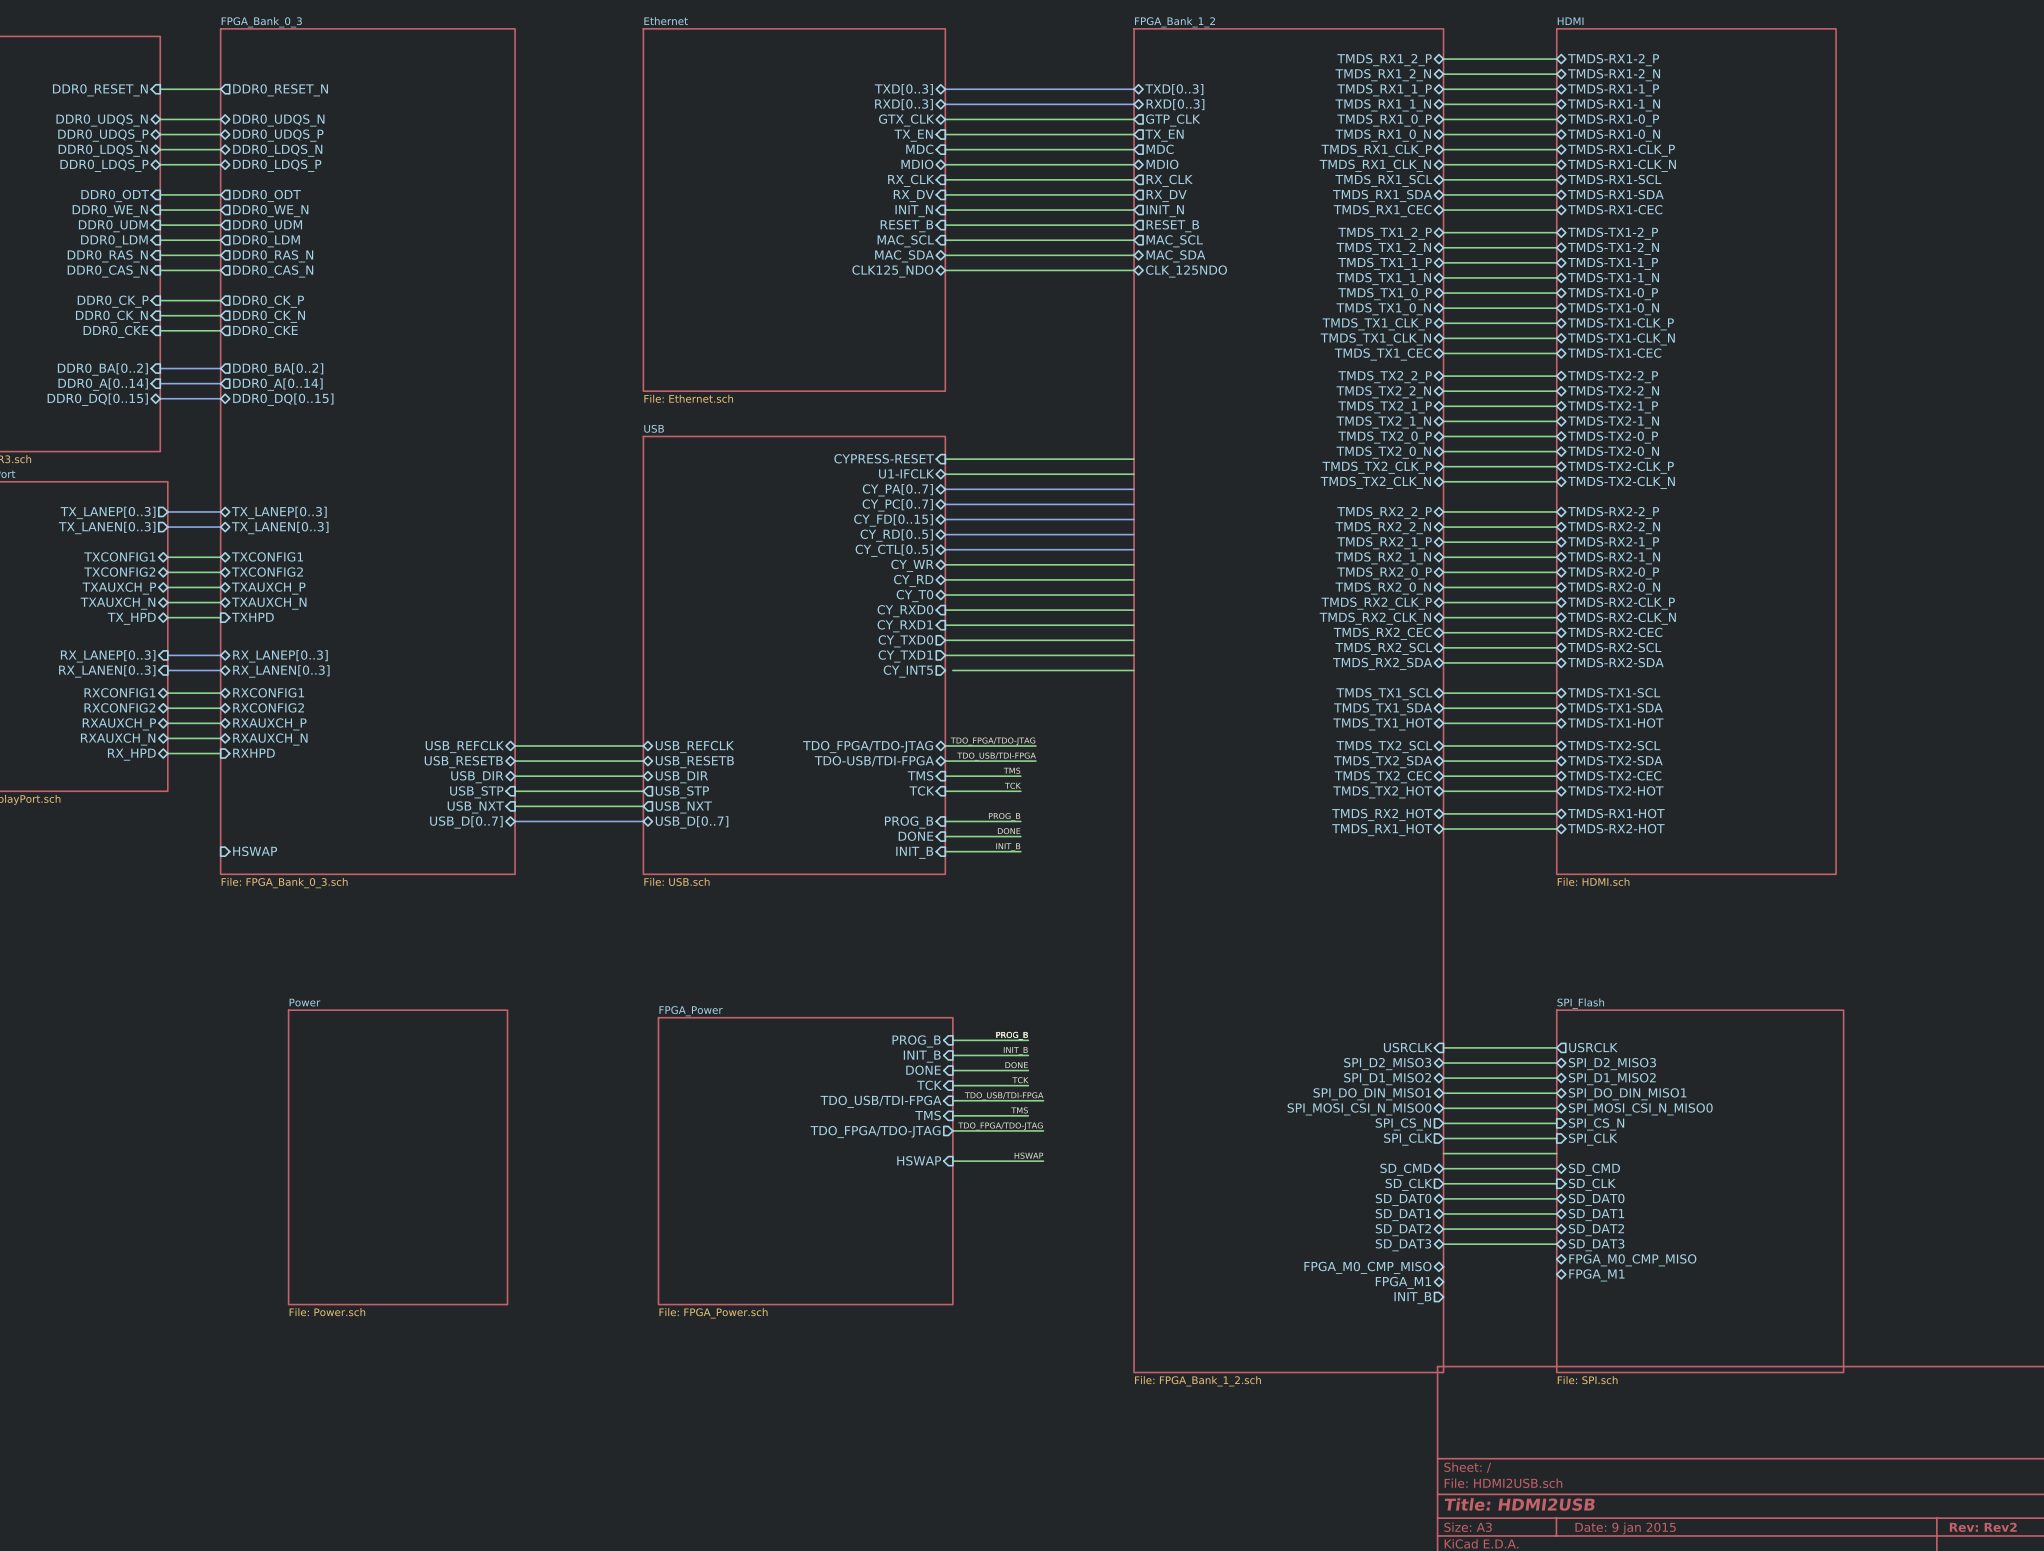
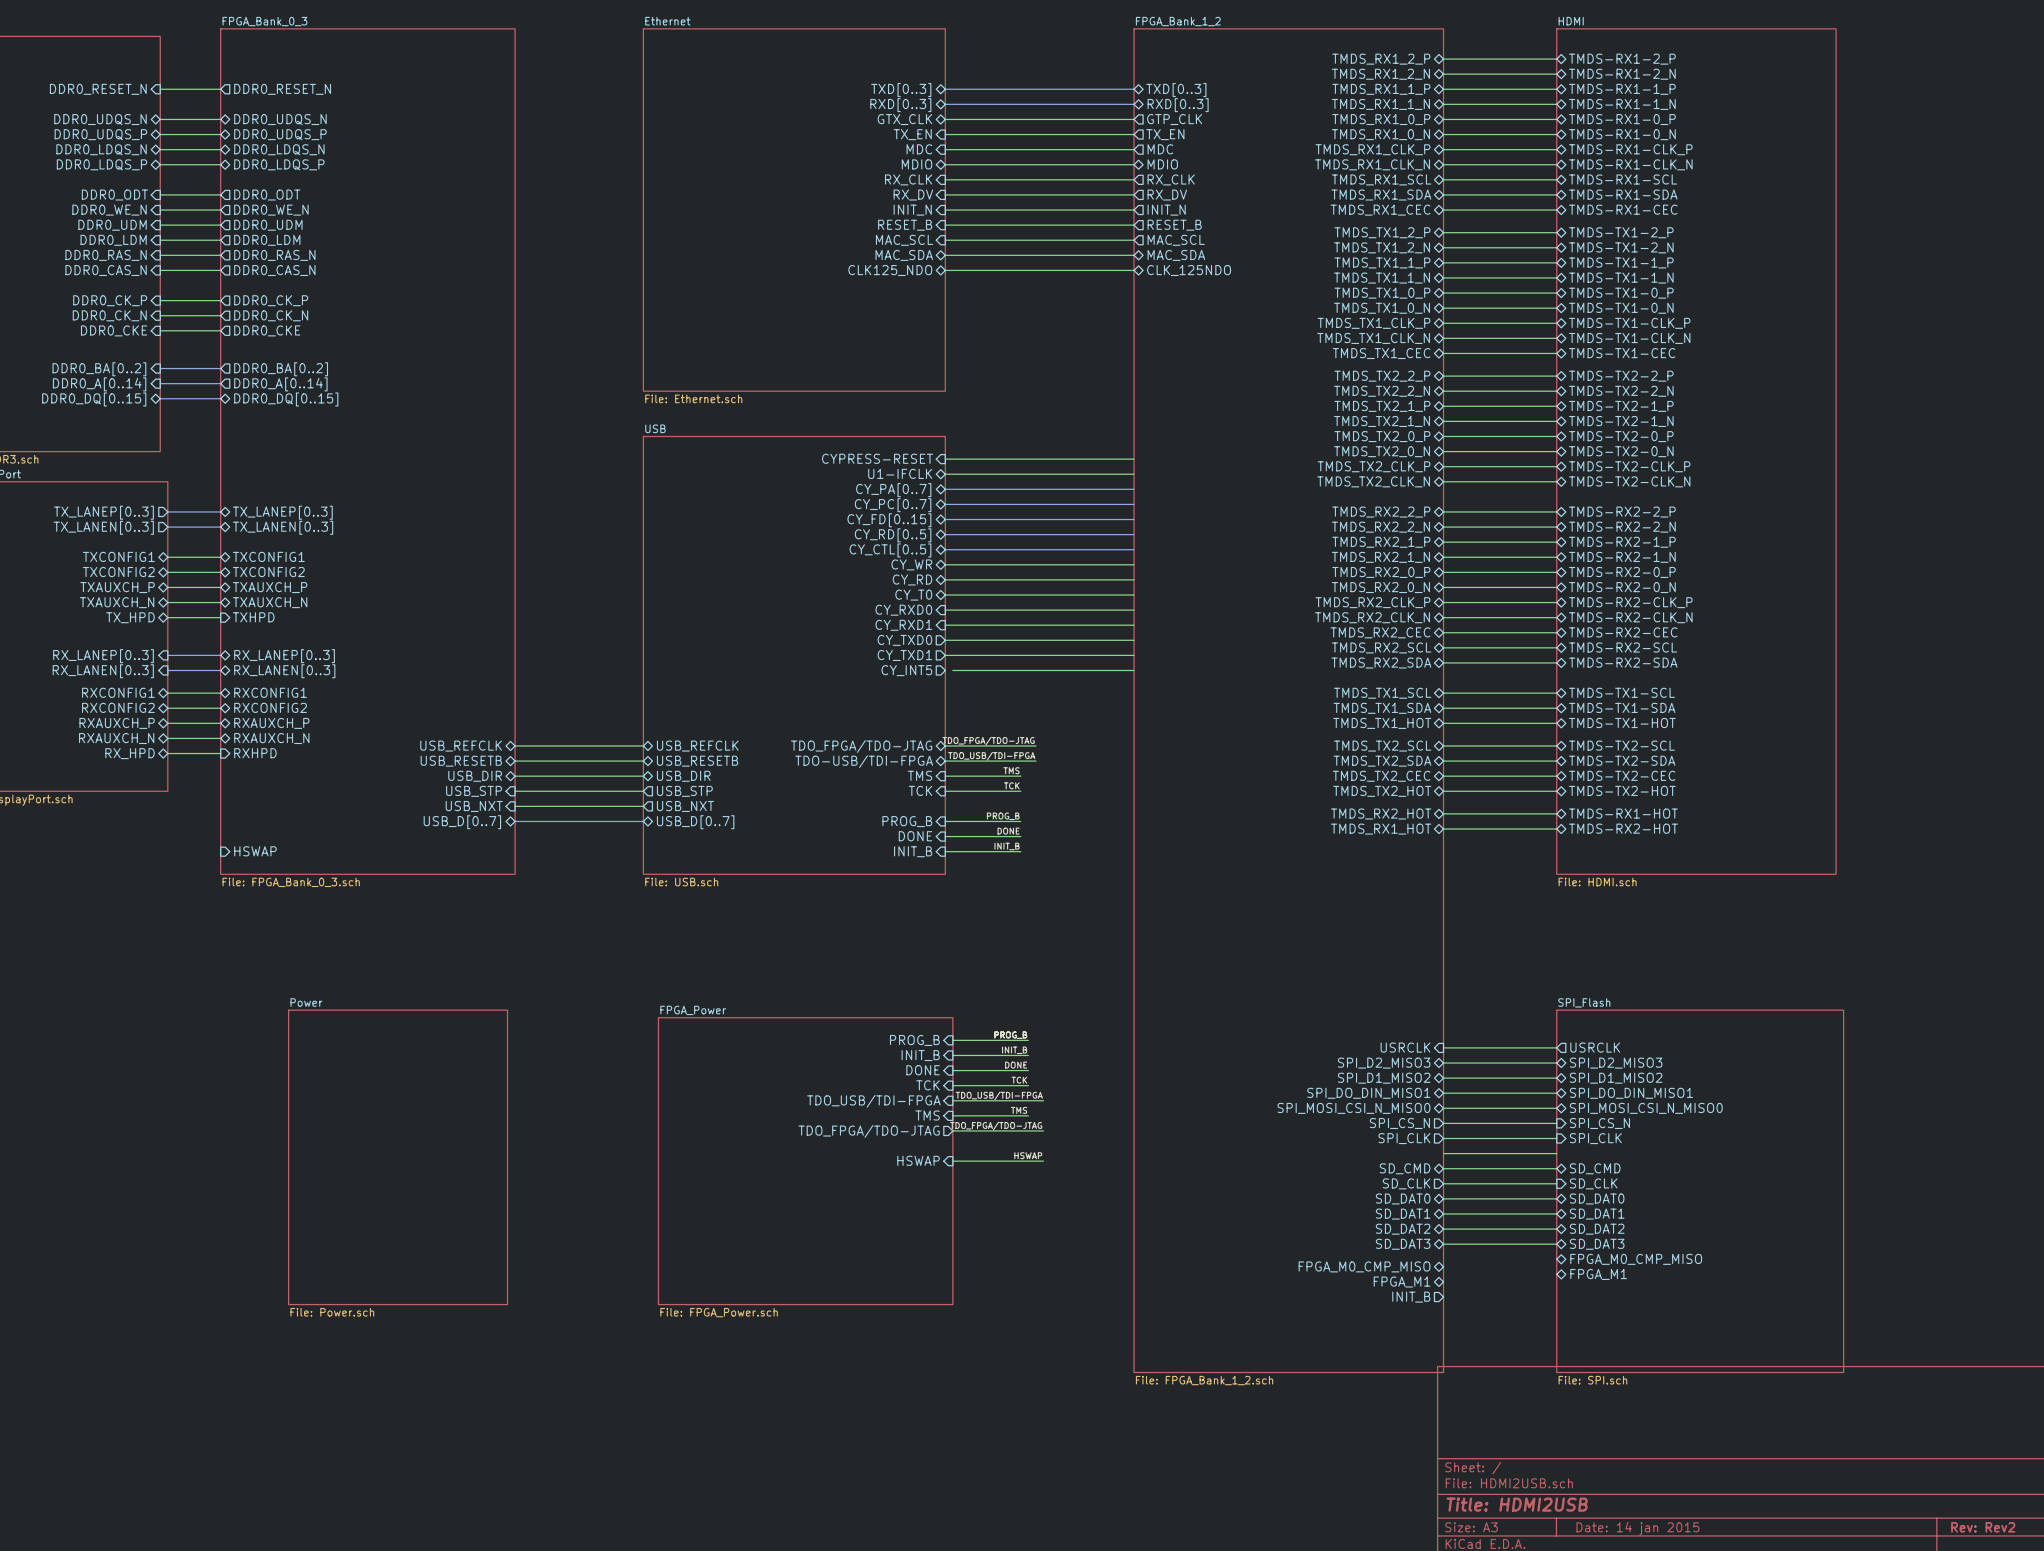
title block: Date: 9 jan 2015 (1625, 1528) -> Date: 14 jan 2015 (1637, 1528)

